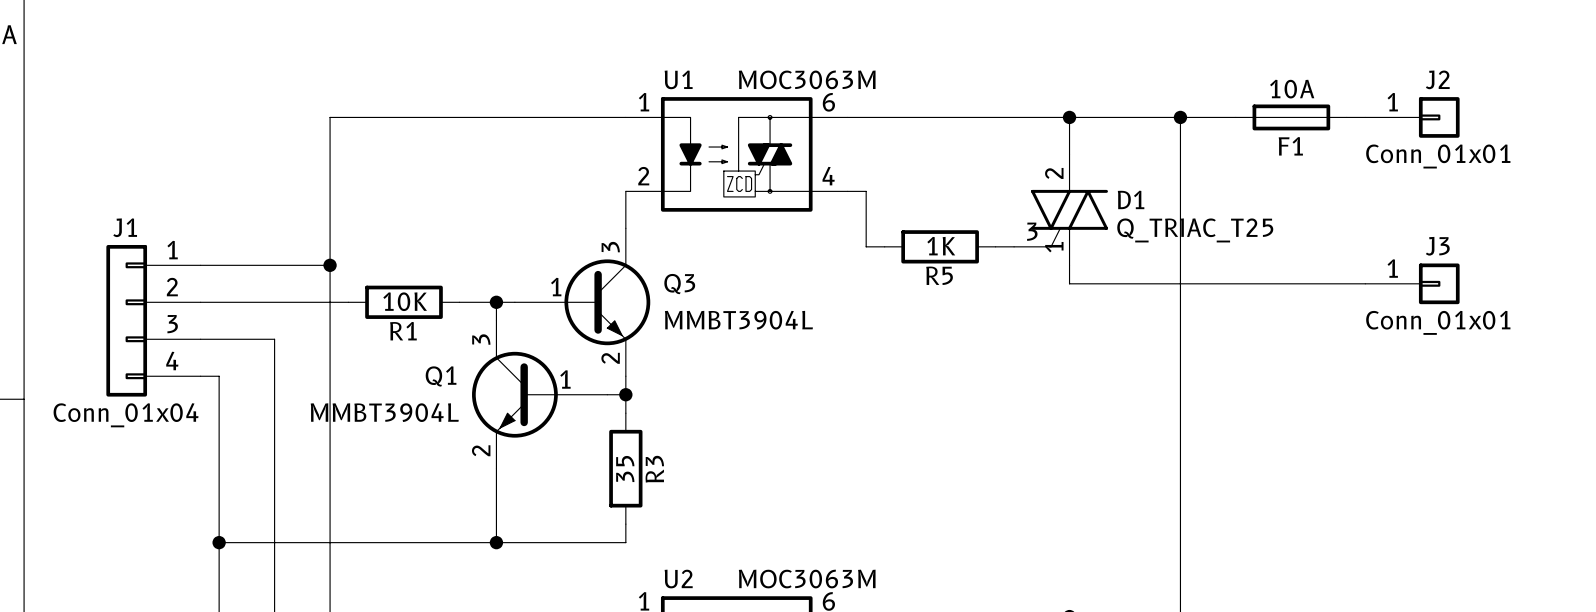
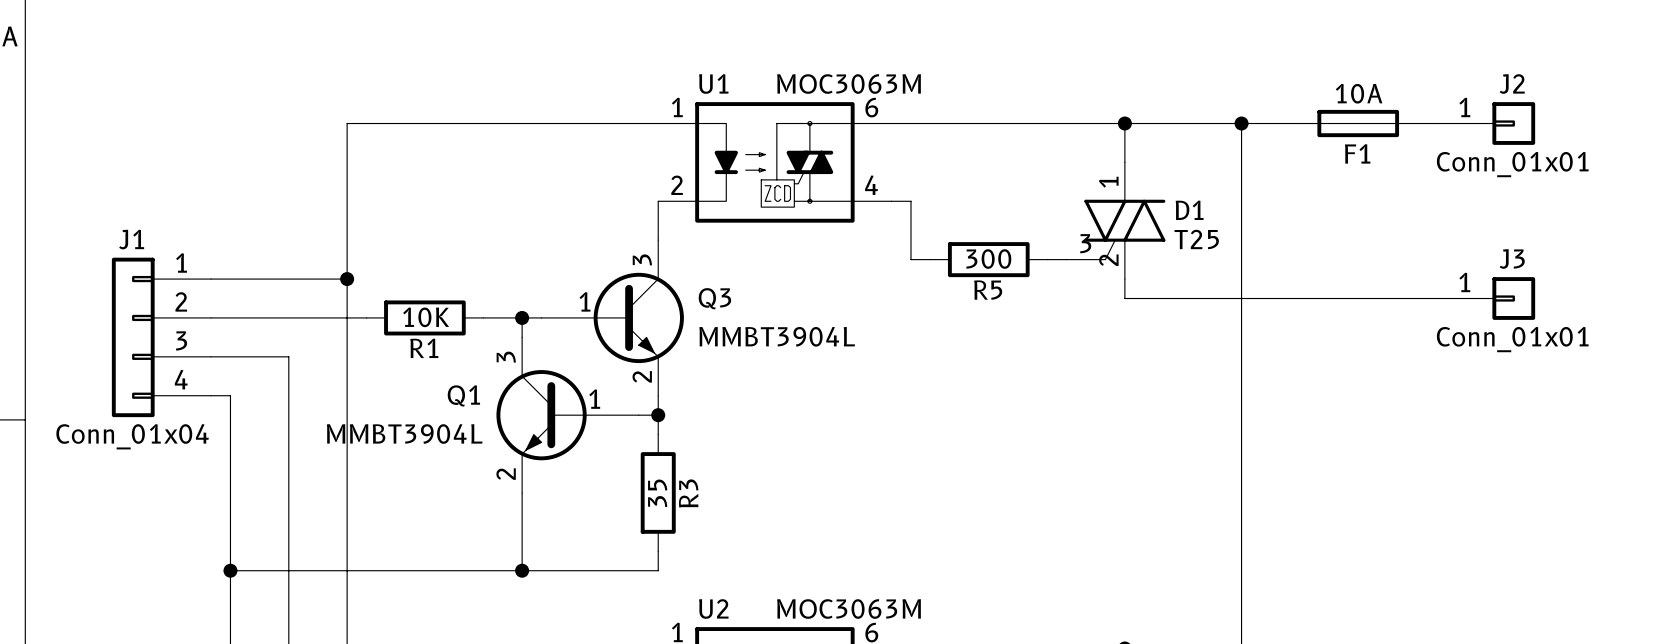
D1 pin number: 2 (1054, 173) -> 1 (1108, 182)
D1 value: Q_TRIAC_T25 (1195, 230) -> T25 (1196, 239)
R5 value: 1K (941, 246) -> 300 (988, 259)
D1 pin number: 1 (1054, 247) -> 2 (1108, 260)

